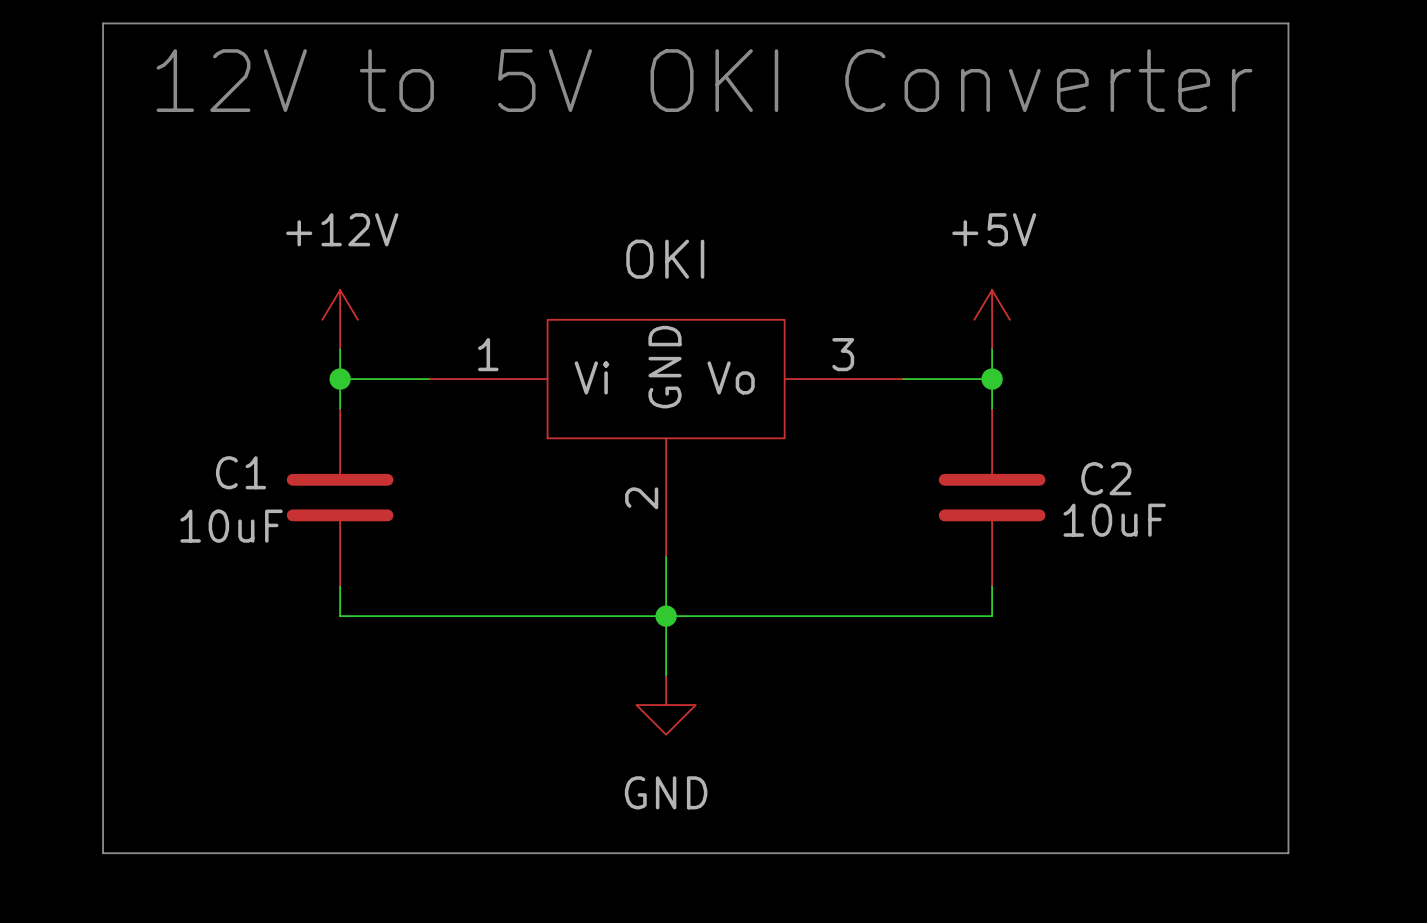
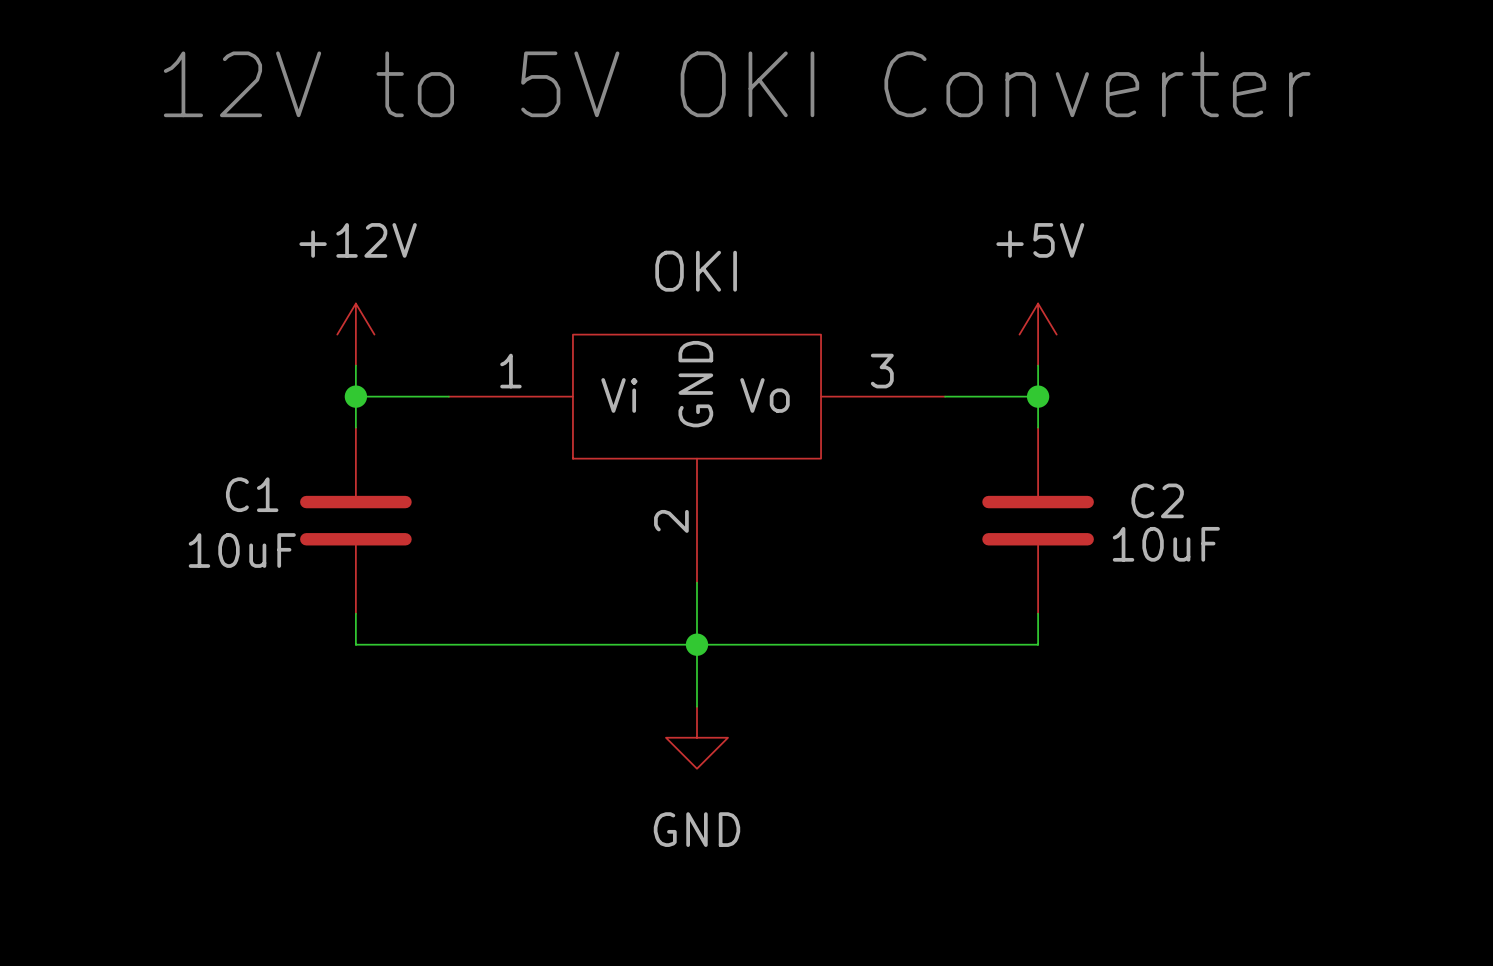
line: (103, 23) (103, 853) (1288, 853) (1288, 23) (103, 23) -> none

